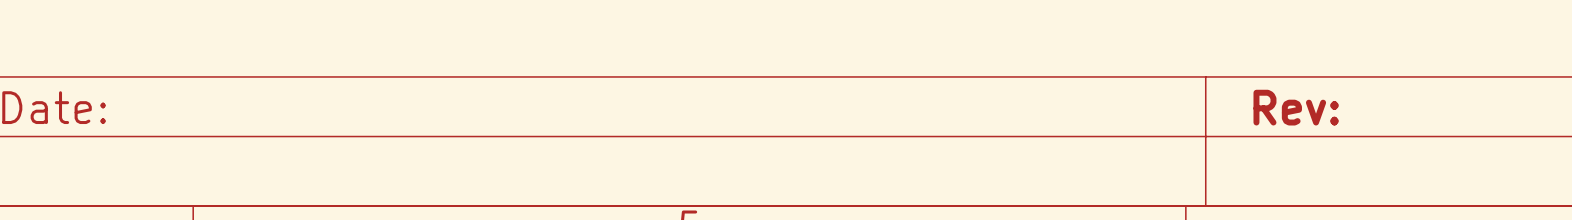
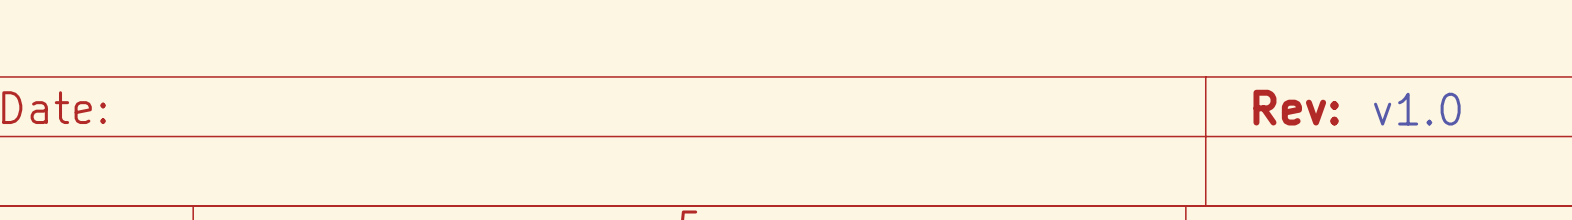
text: none -> v1.0 (1417, 109)

